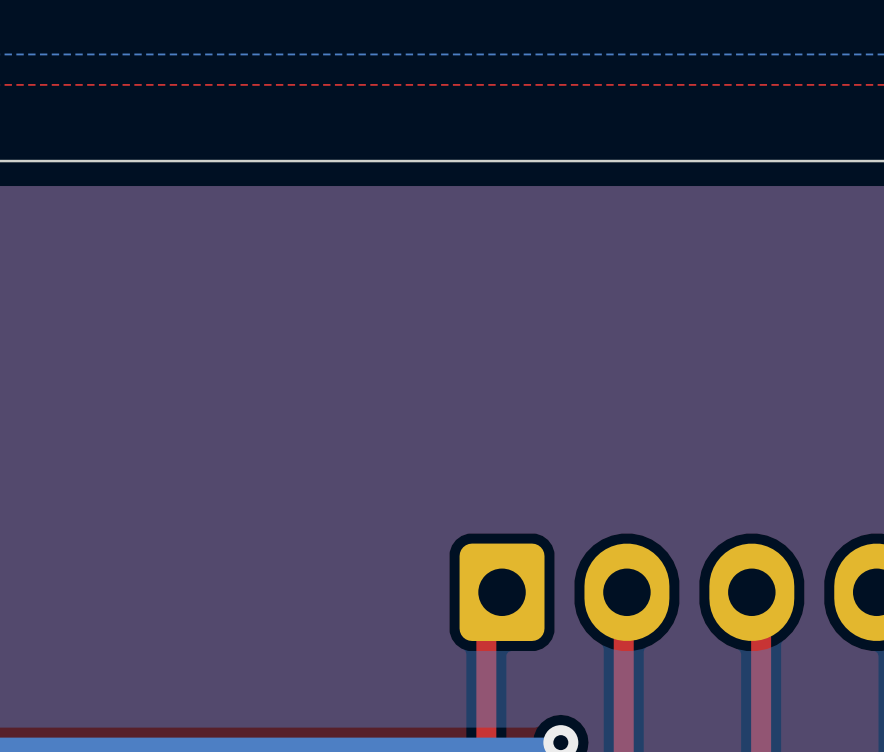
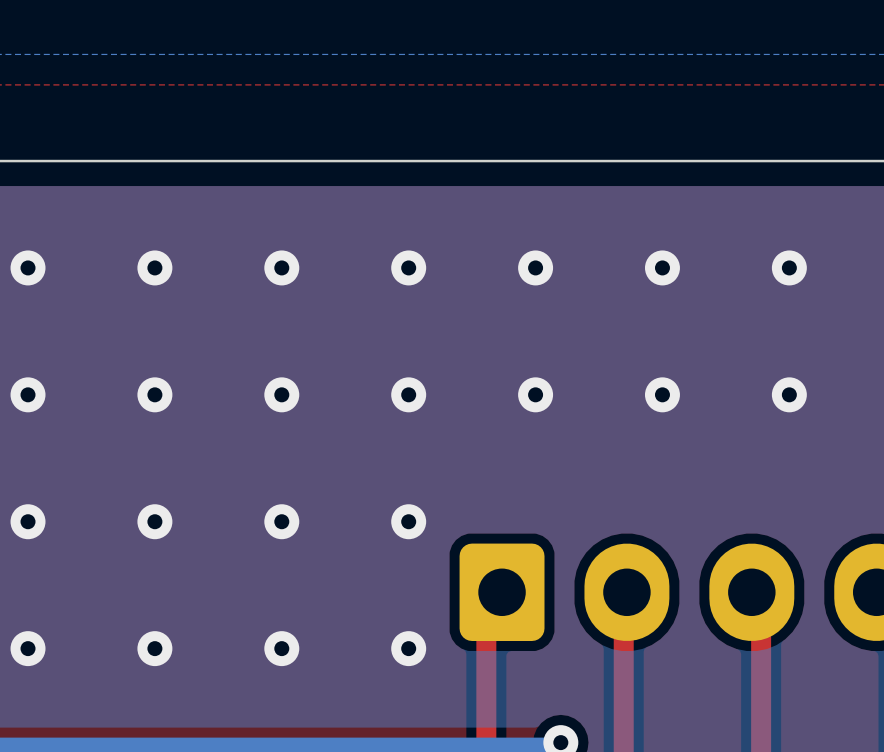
via: none -> (28, 267)
via: none -> (154, 267)
via: none -> (281, 267)
via: none -> (408, 267)
via: none -> (535, 267)
via: none -> (662, 267)
via: none -> (789, 267)
via: none -> (28, 394)
via: none -> (154, 394)
via: none -> (281, 394)
via: none -> (408, 394)
via: none -> (535, 394)
via: none -> (662, 394)
via: none -> (789, 394)
via: none -> (28, 521)
via: none -> (154, 521)
via: none -> (281, 521)
via: none -> (408, 521)
via: none -> (28, 648)
via: none -> (154, 648)
via: none -> (281, 648)
via: none -> (408, 648)

